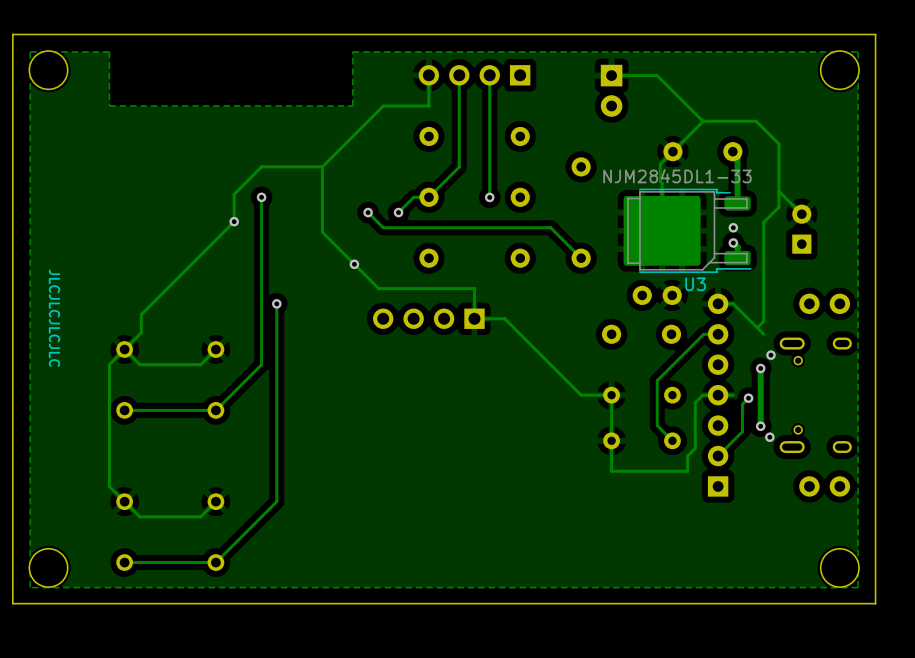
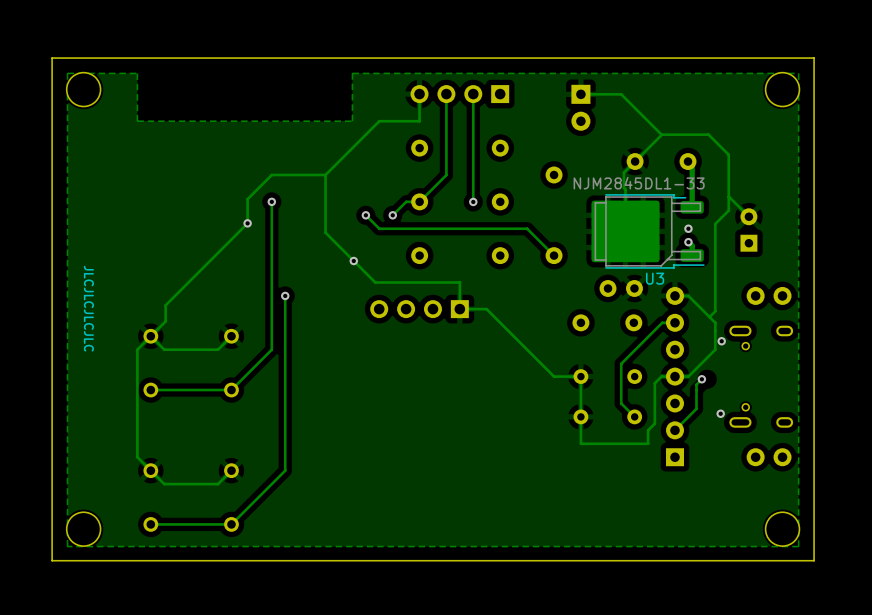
track: none -> (715, 322) (715, 349) (688, 376)
track: (760, 368) (760, 426) -> none
via: (760, 368) -> none
via: (760, 426) -> none

